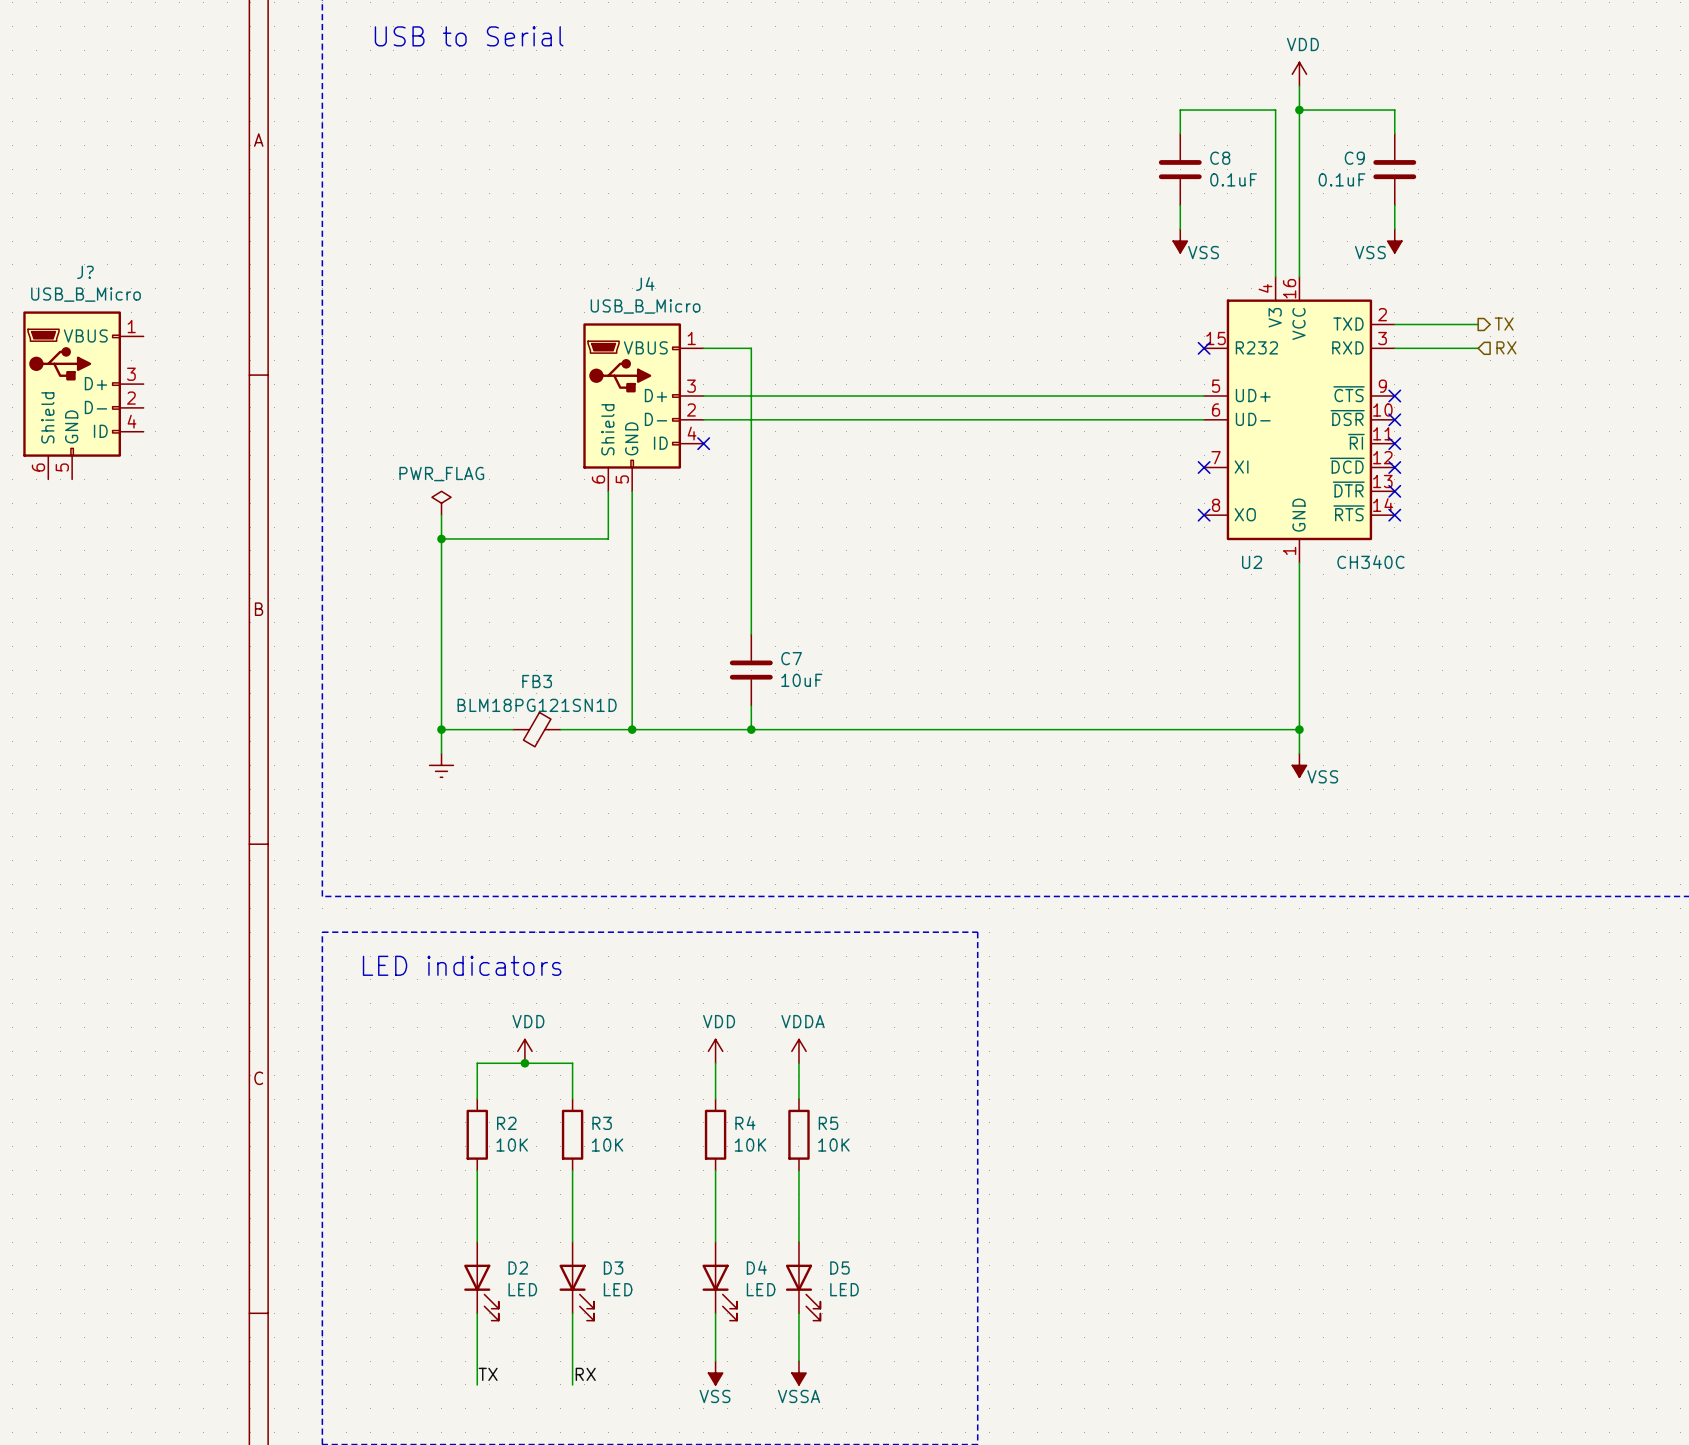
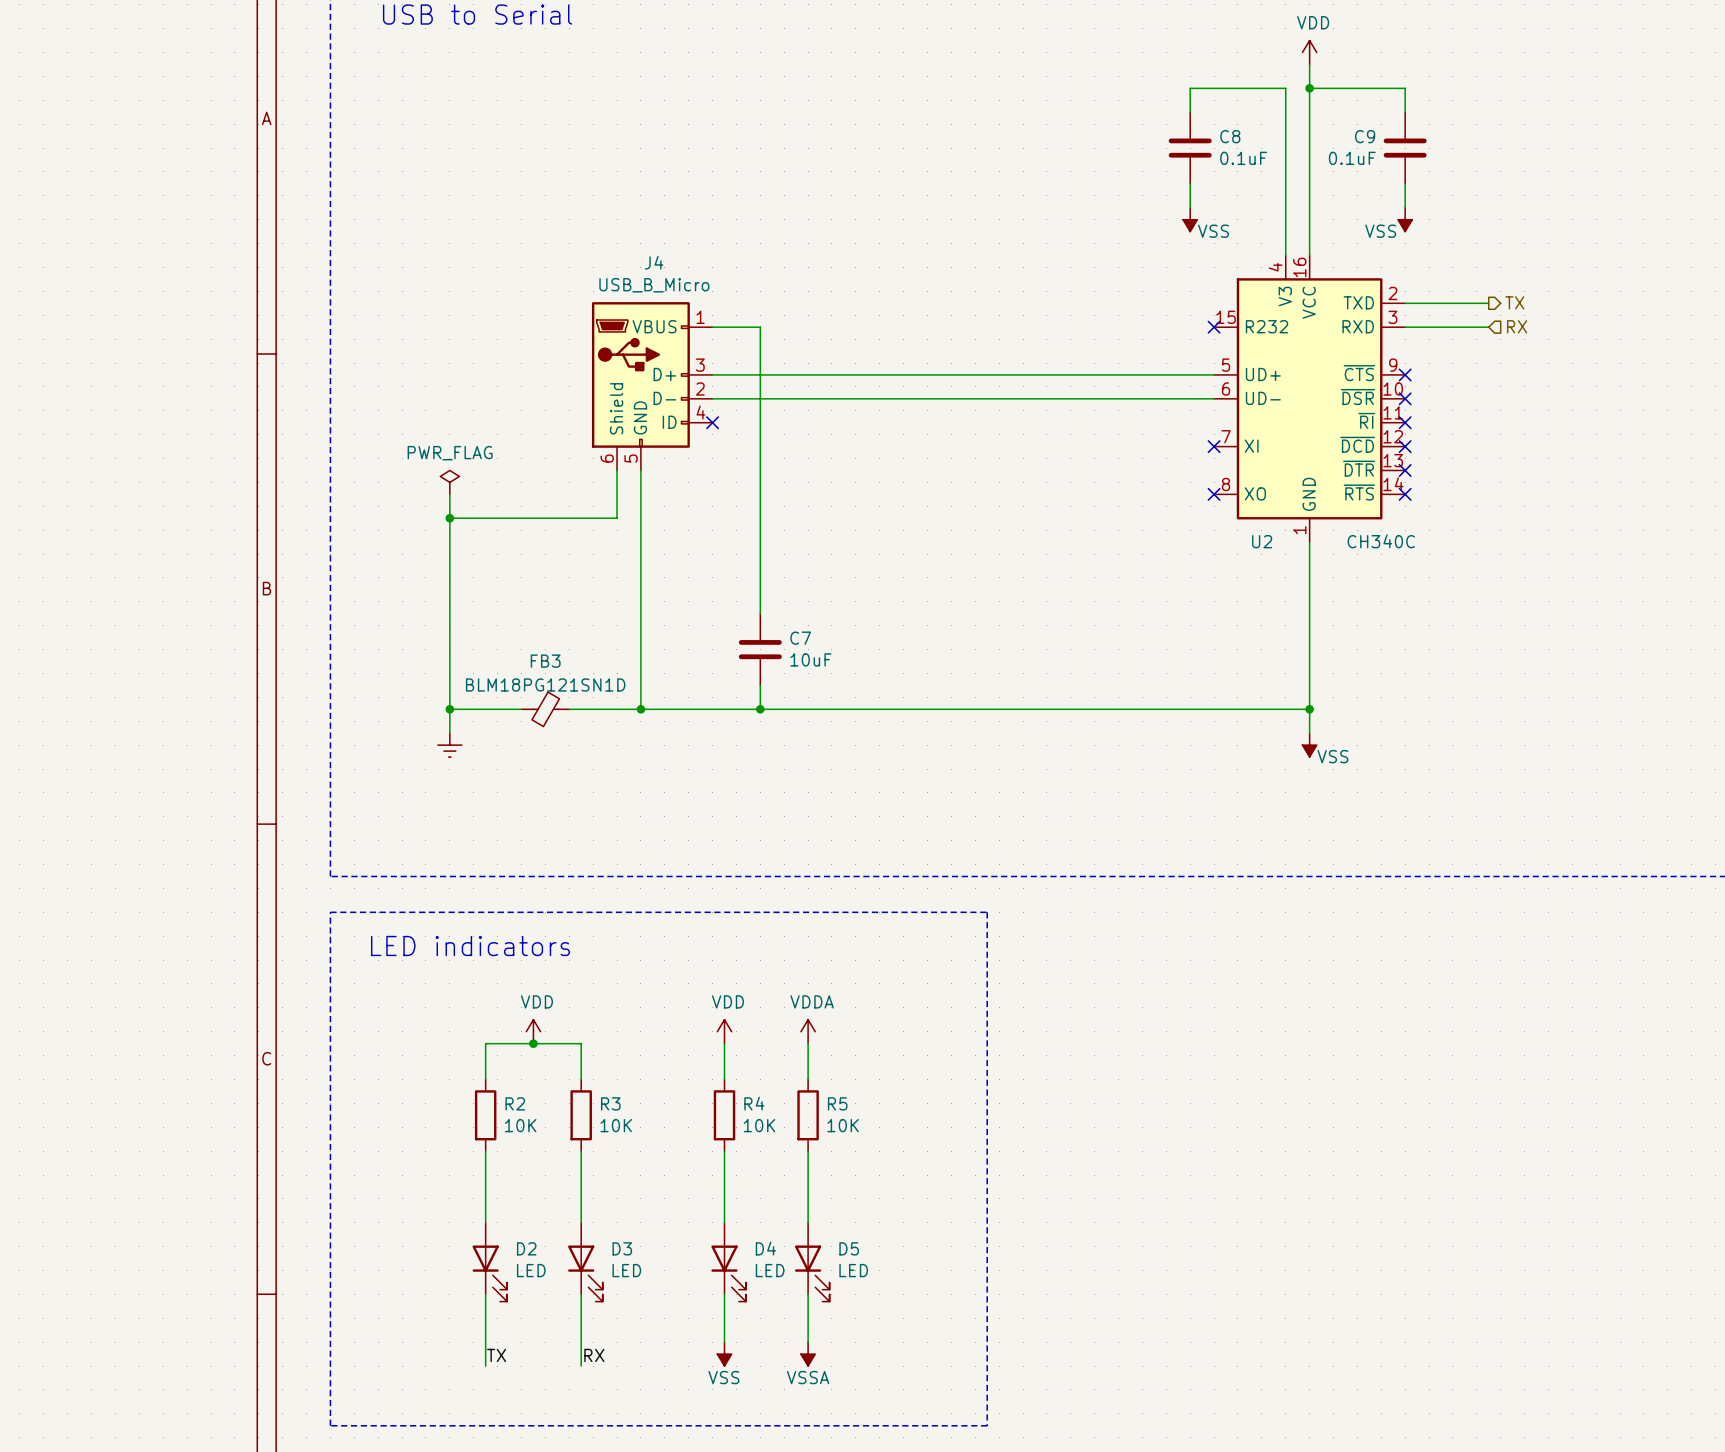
J?: USB_B_Micro (83, 395) -> none

